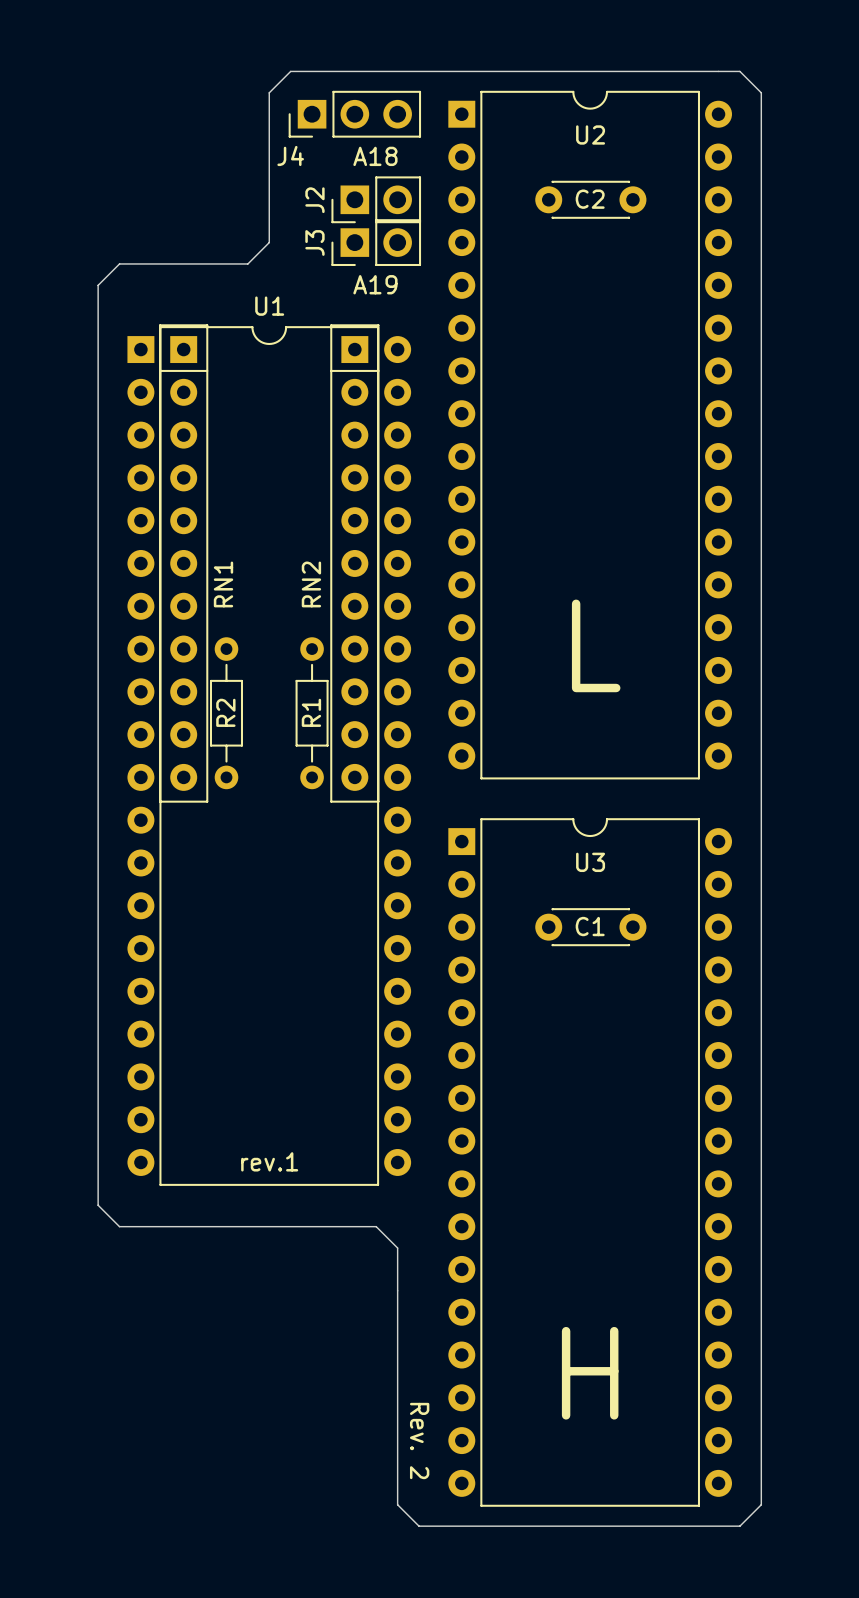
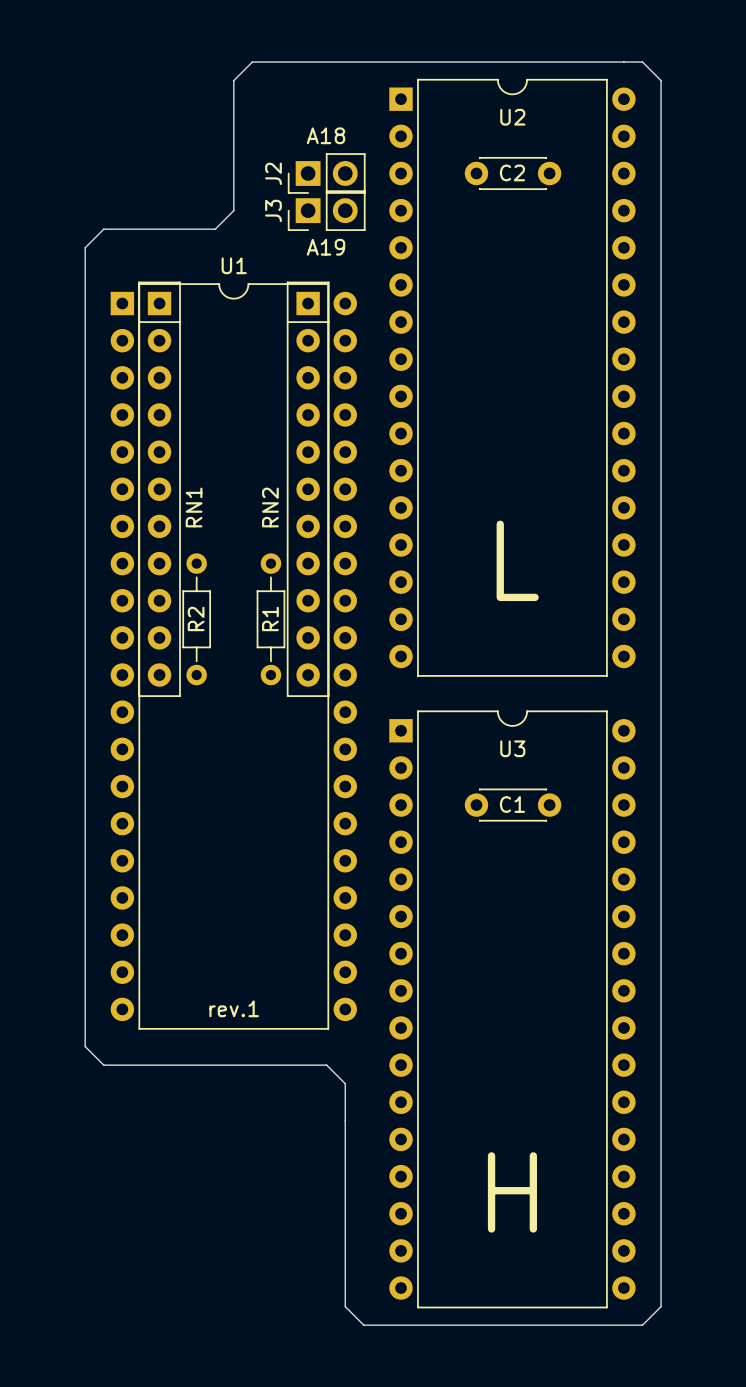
J4: (354, 114) -> none
text: Rev. 2 (419, 1440) -> none

